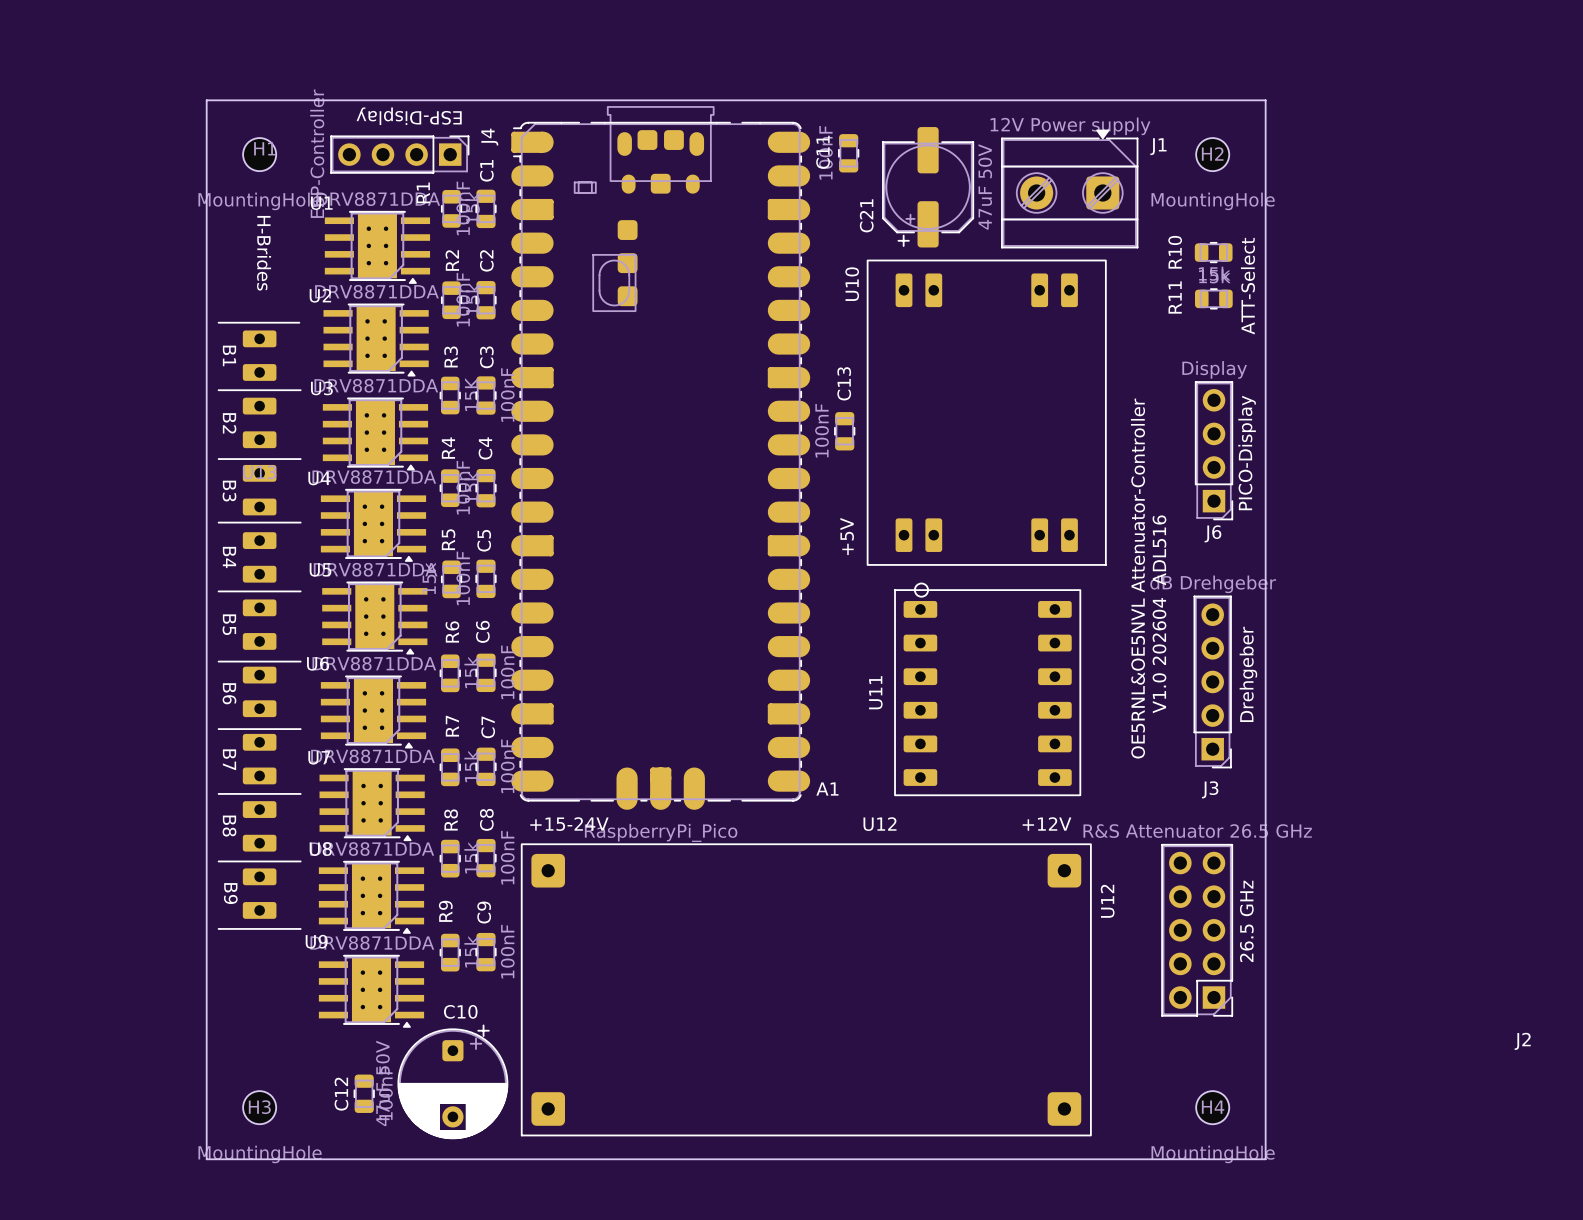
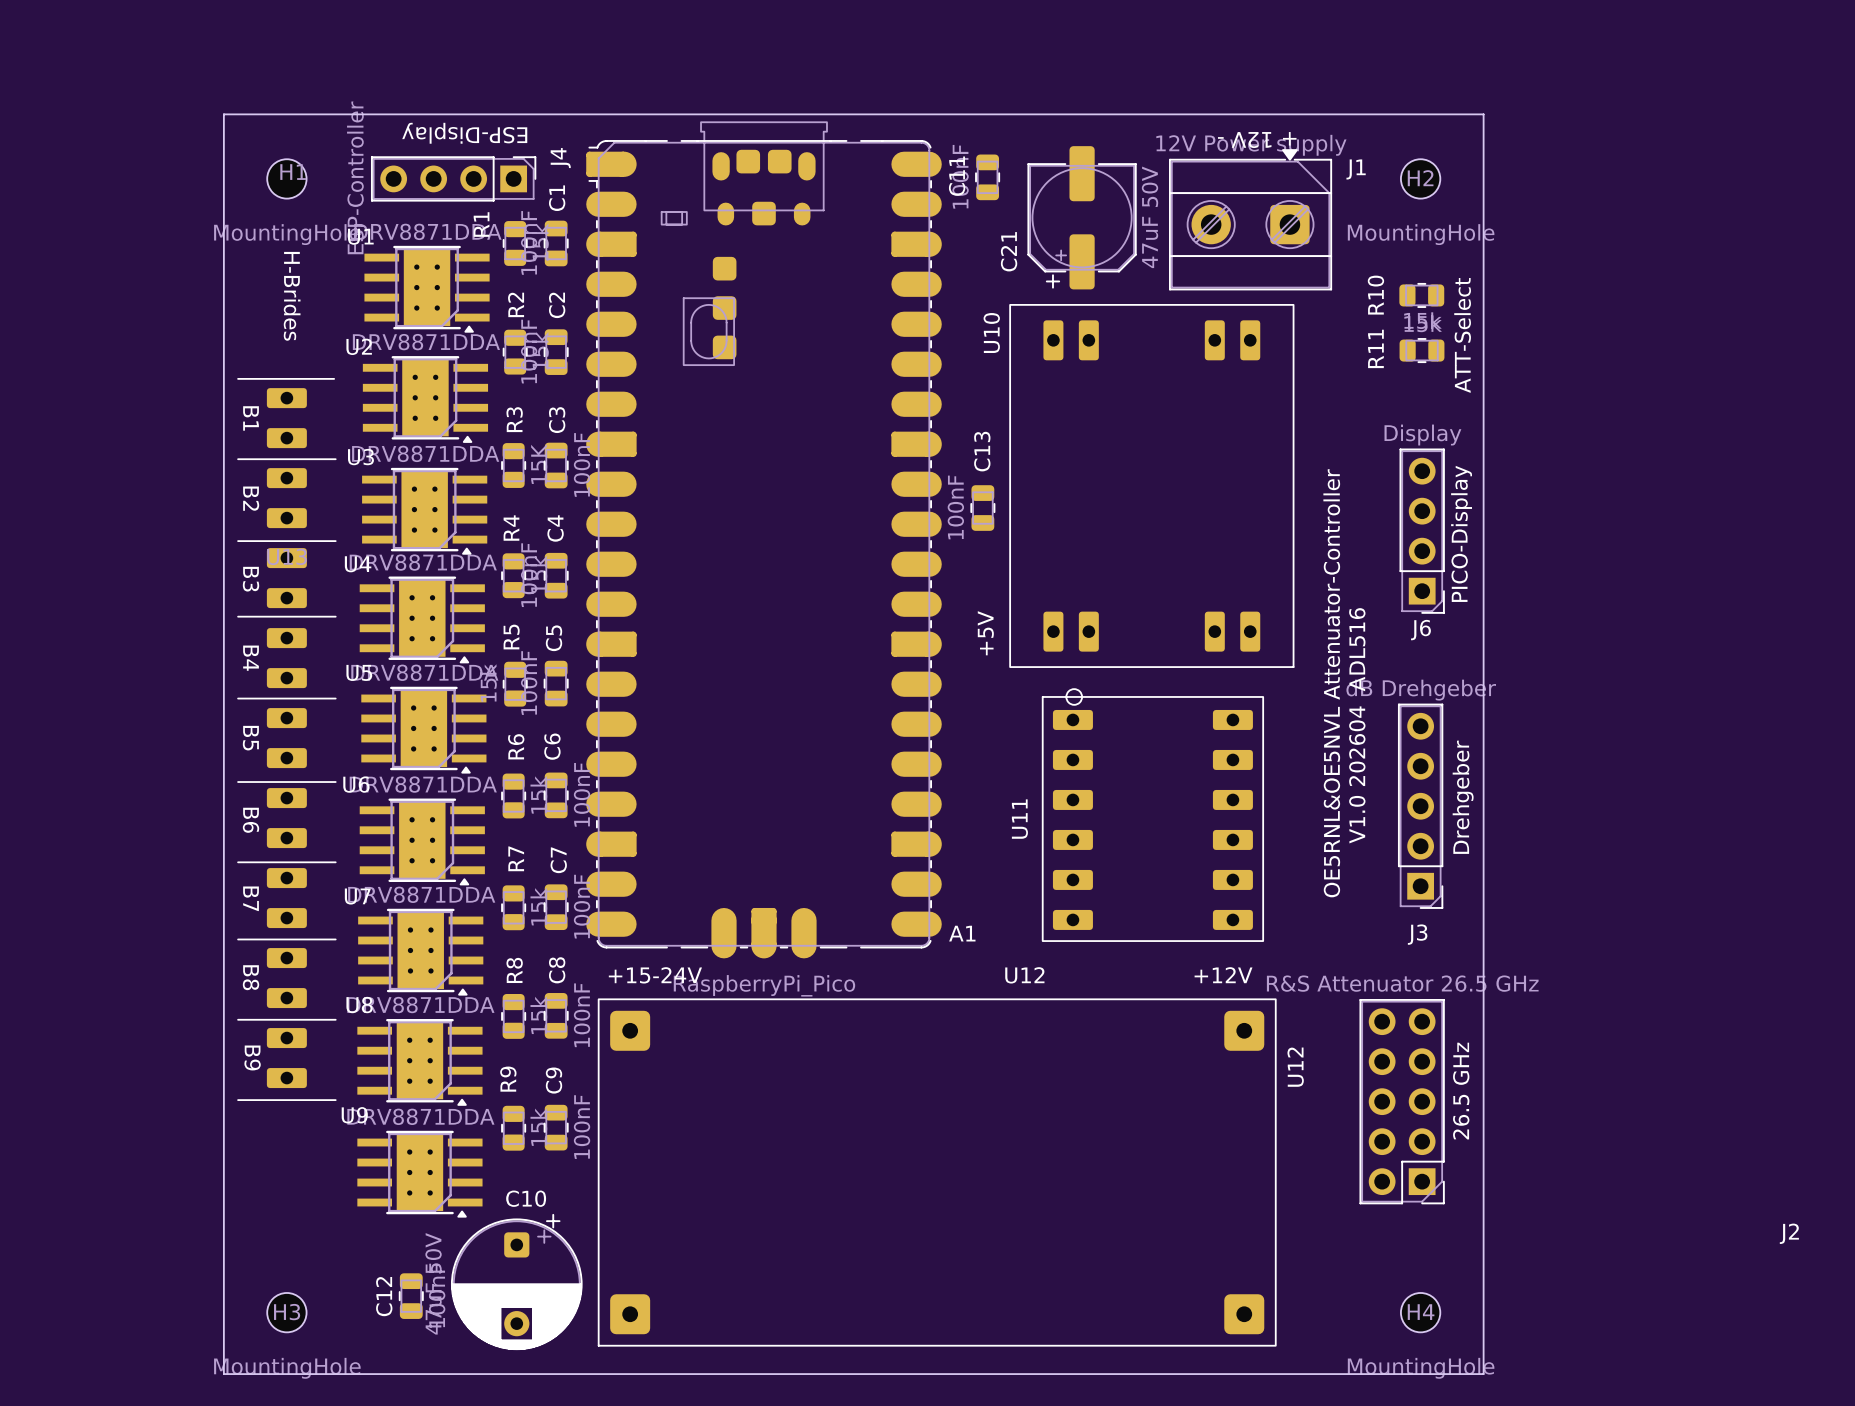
text: none -> + 12V - (1257, 140)

